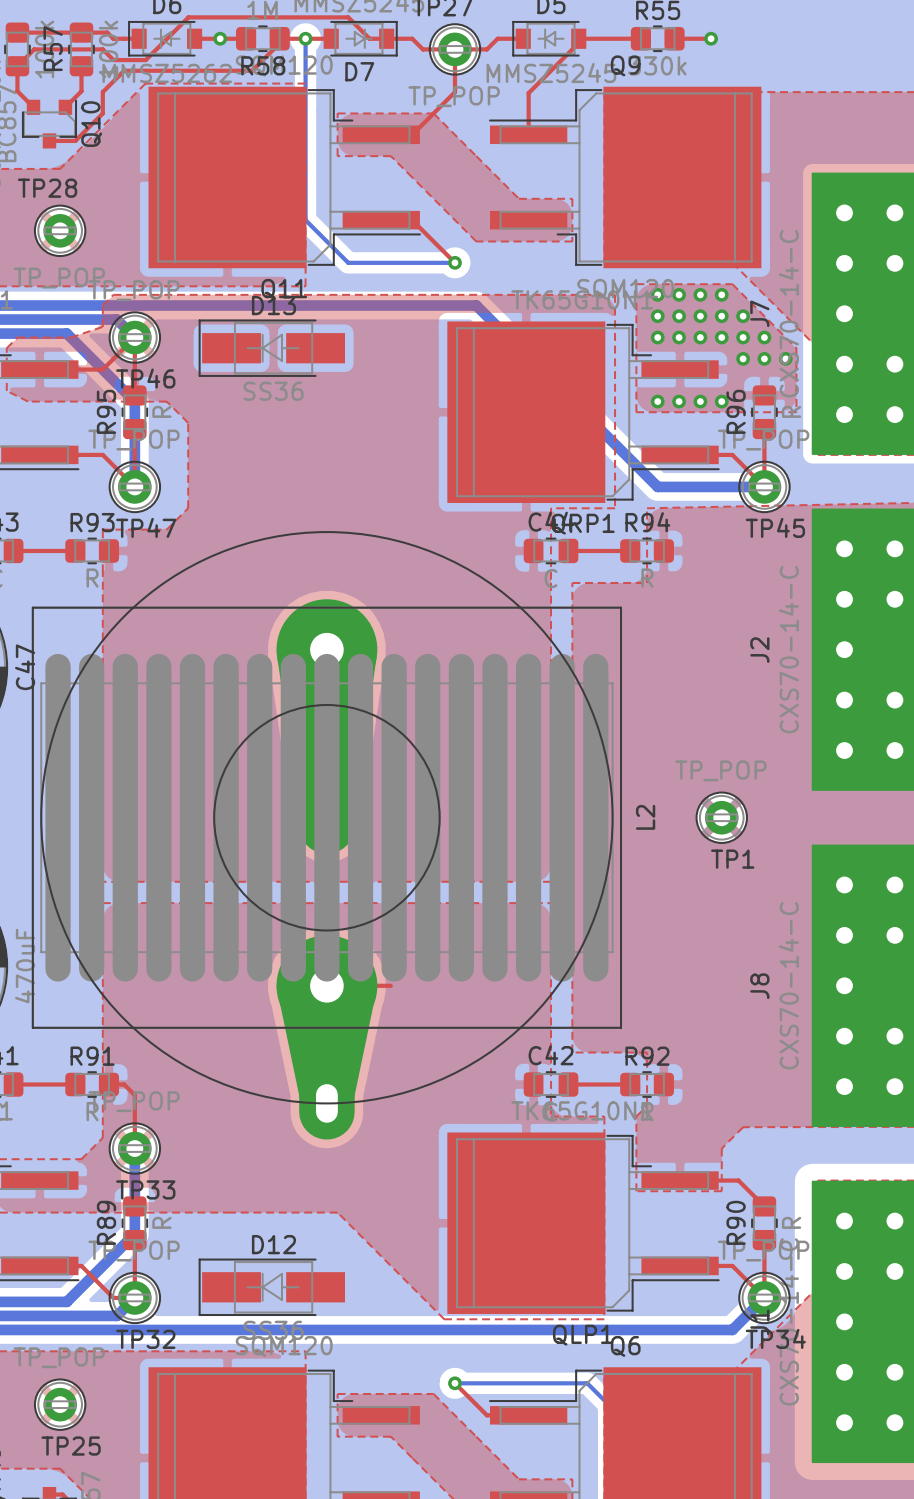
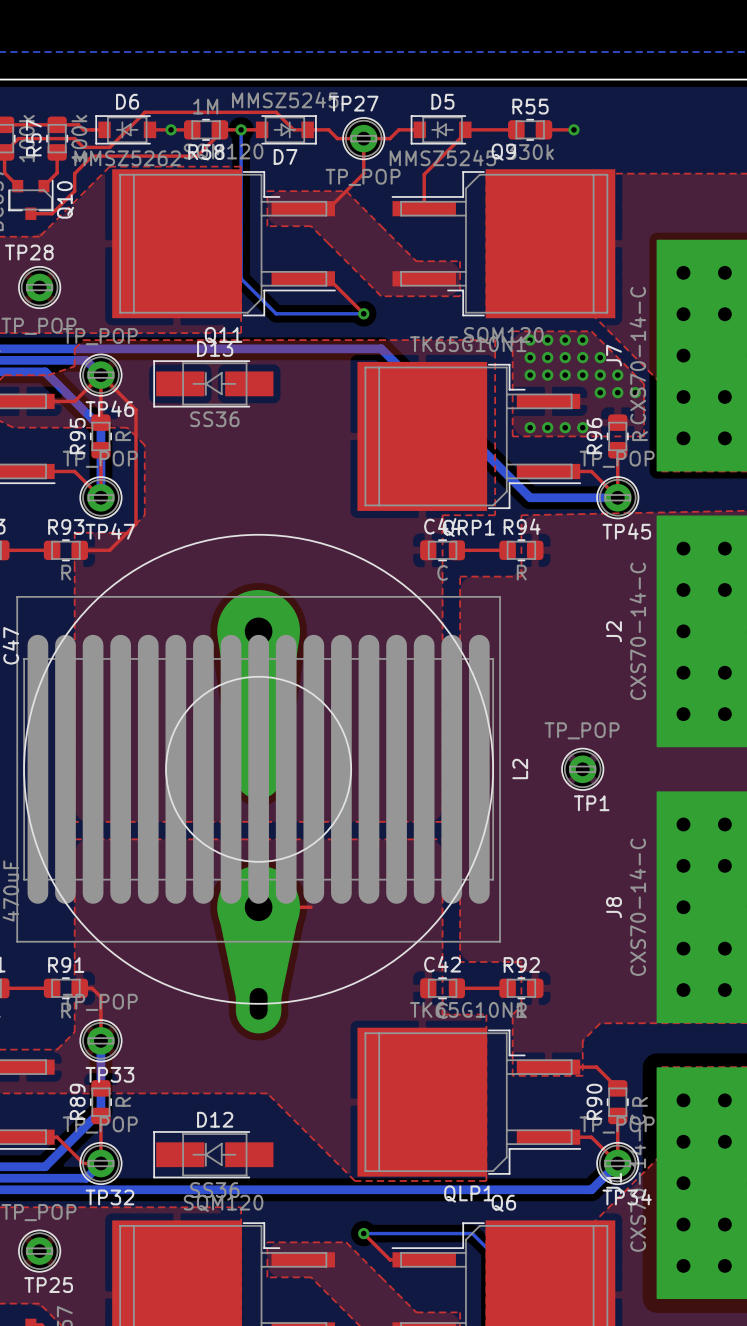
top track: none -> (100, 375) (135, 410) (135, 524) (109, 550) (79, 550)
L2 footprint: [31, 531, 623, 1140] -> [16, 533, 501, 1034]

